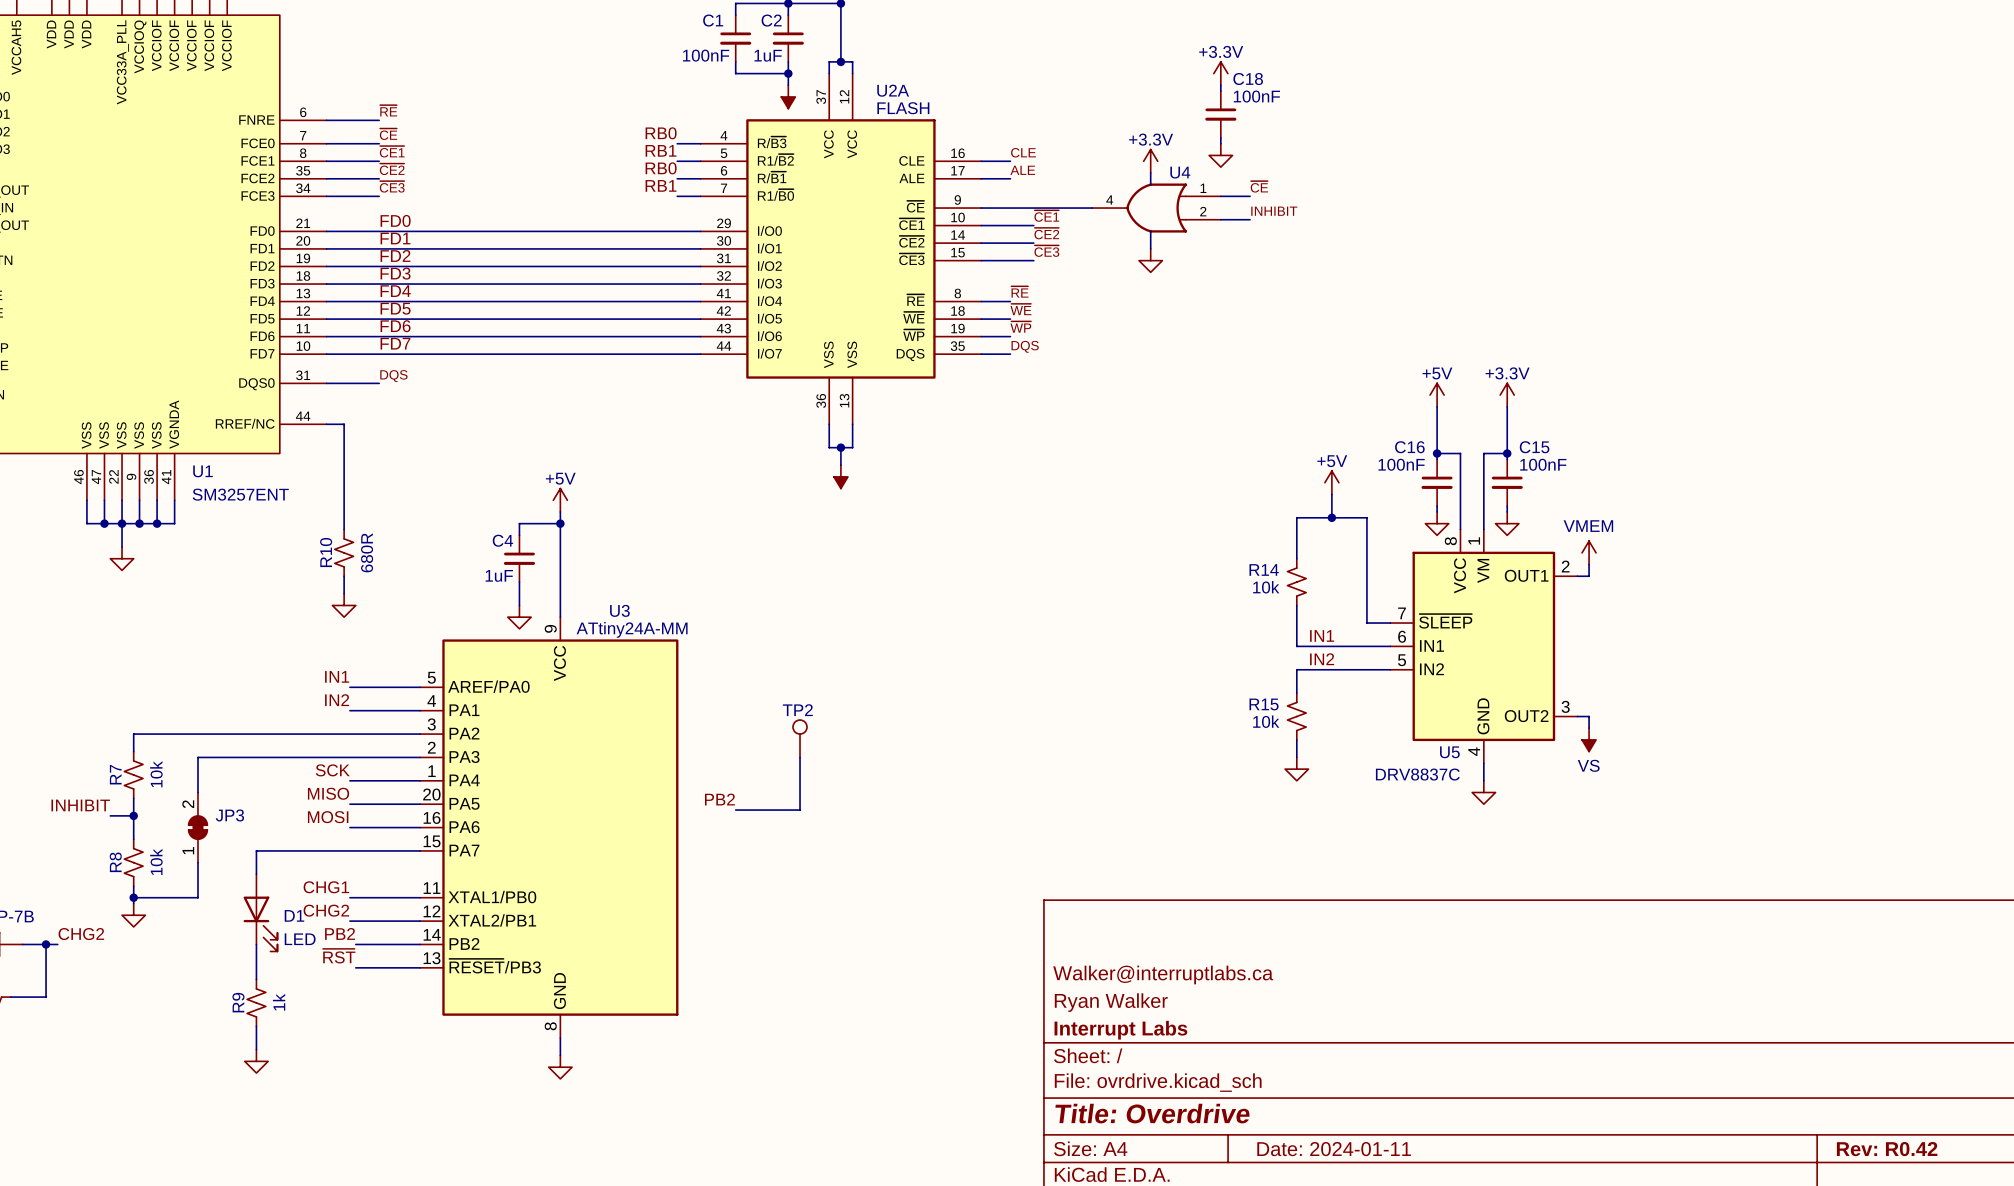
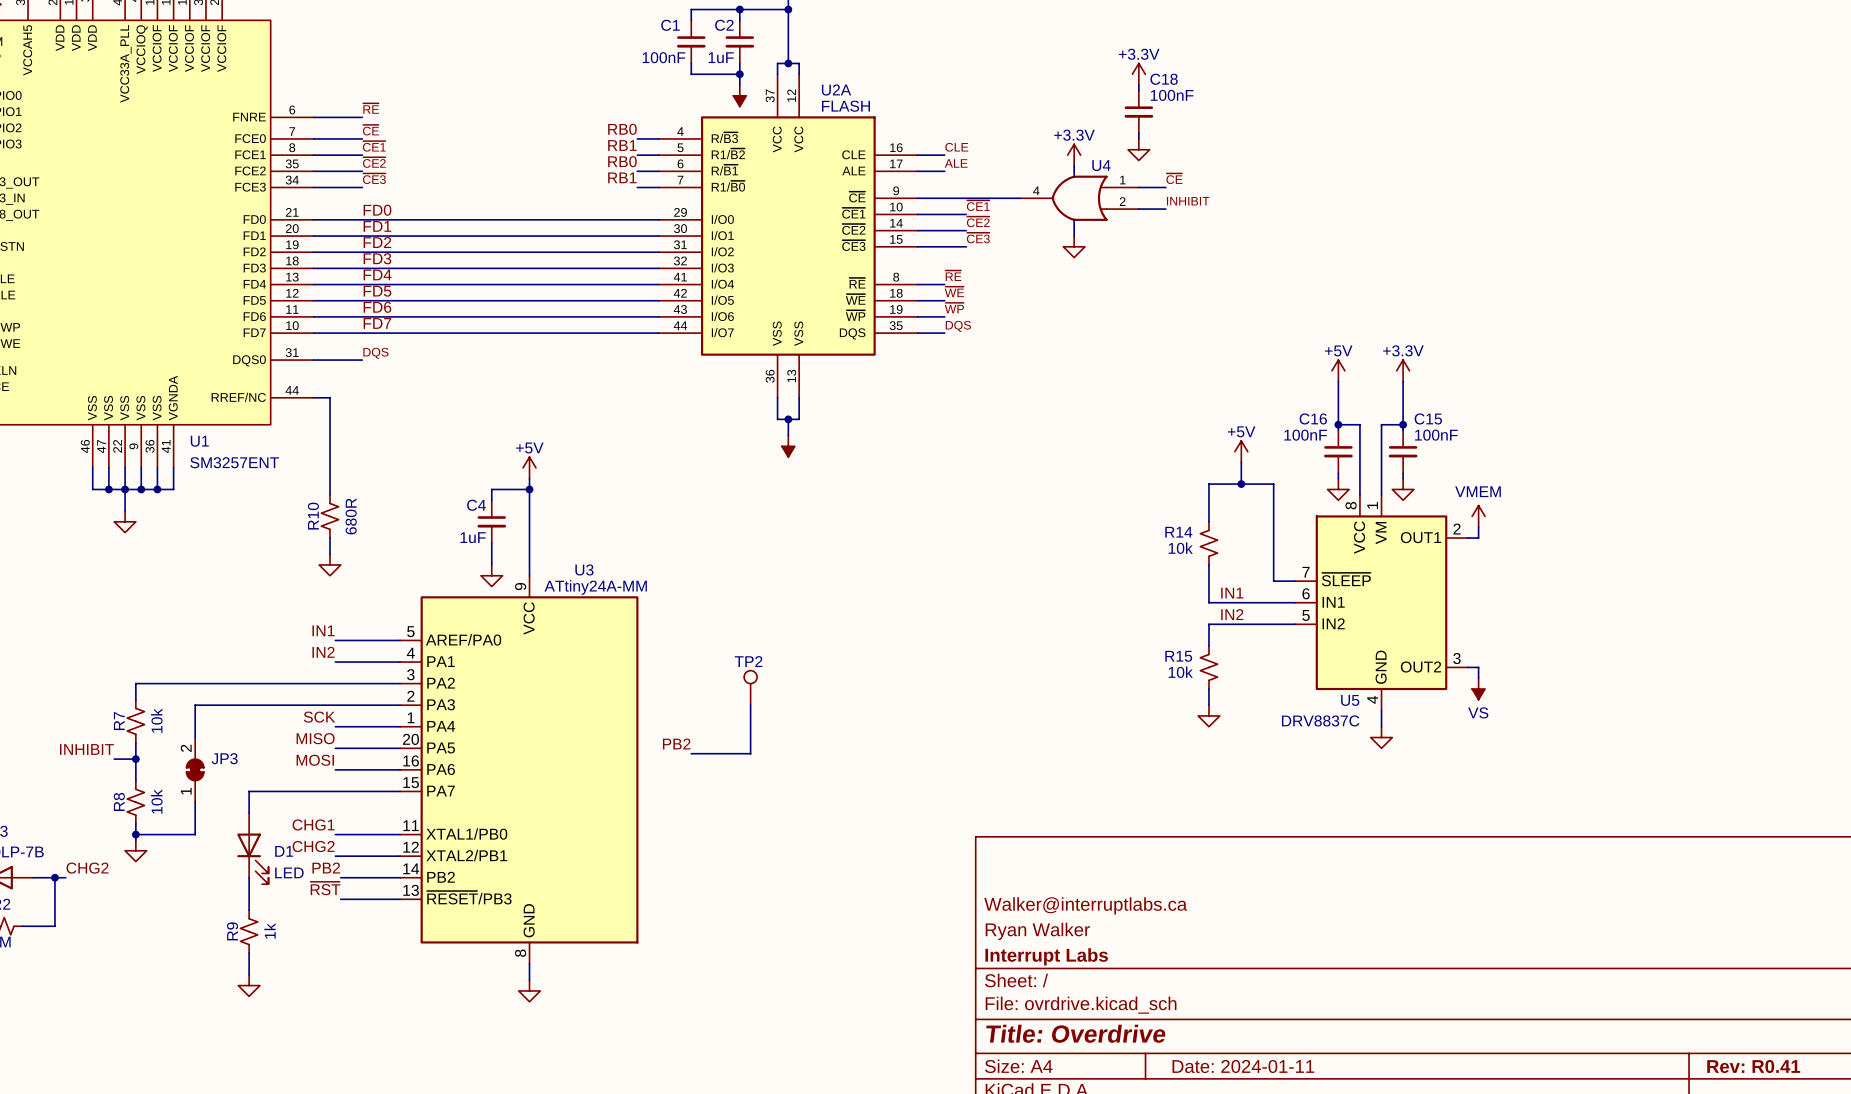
title block: Rev: R0.42 (1887, 1149) -> Rev: R0.41 (1753, 1066)

